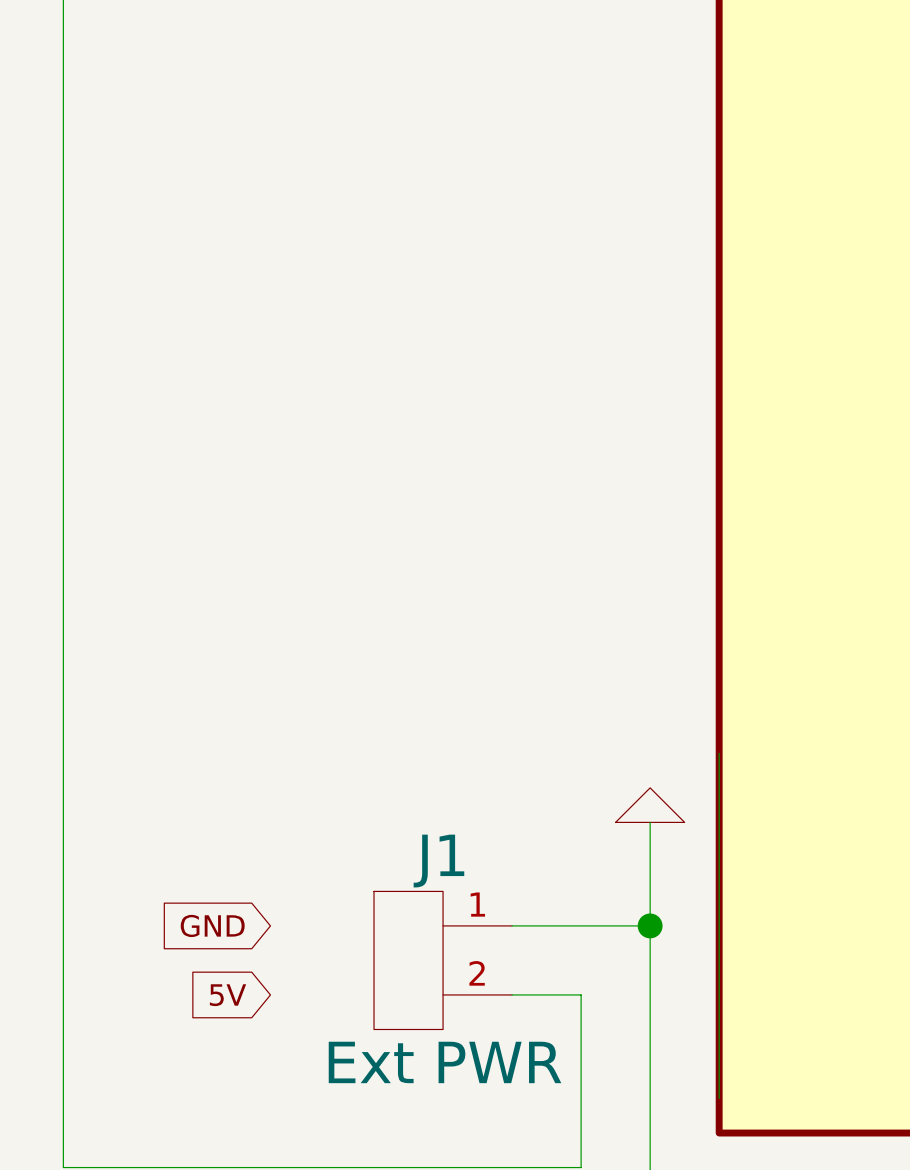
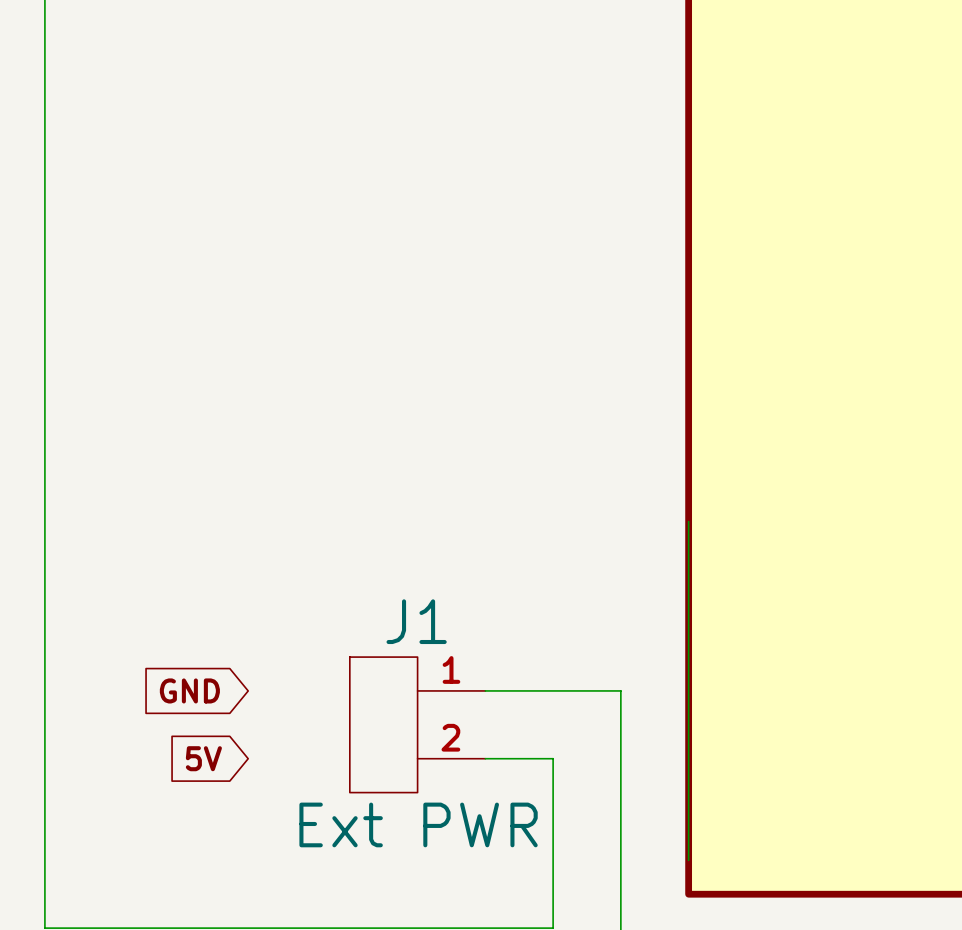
power symbol: (650, 805) -> none
wire: (650, 822) (650, 925) -> none
junction: (650, 925) -> none

